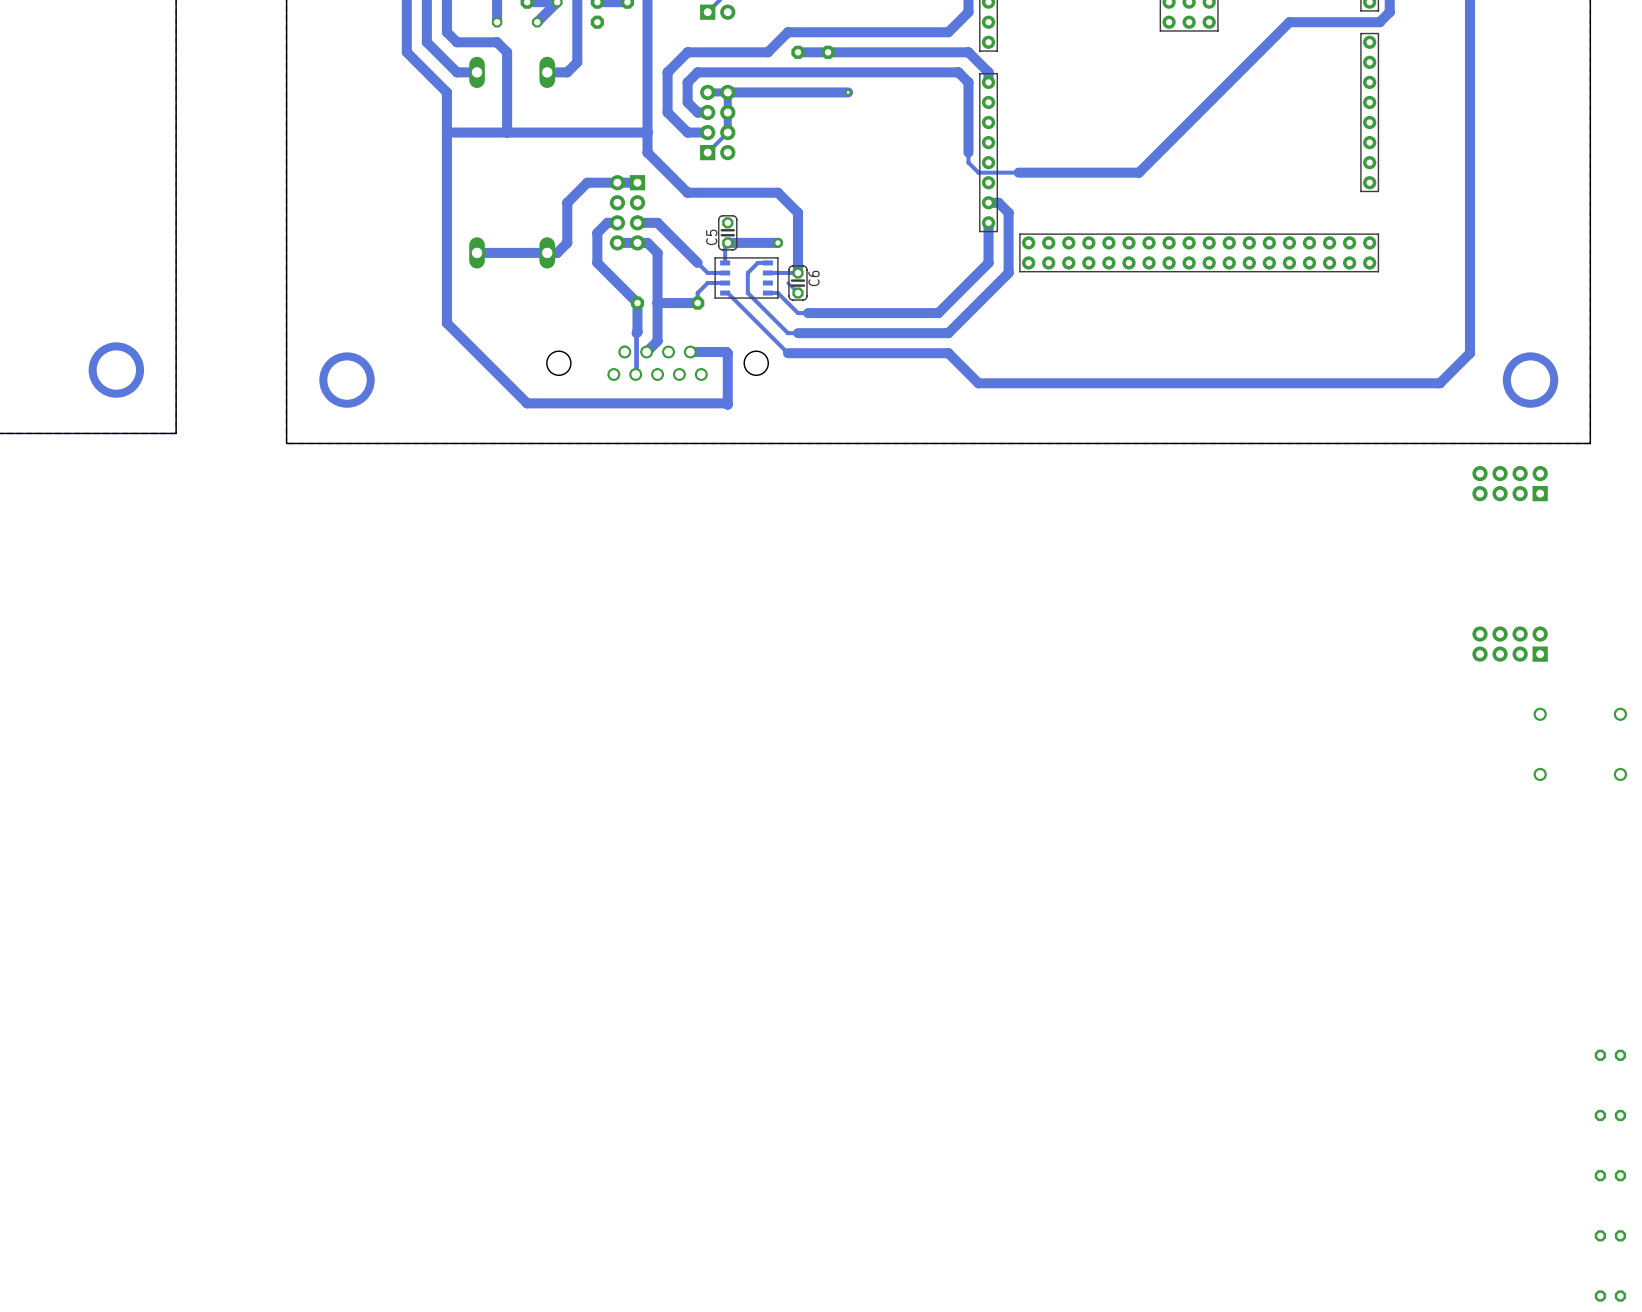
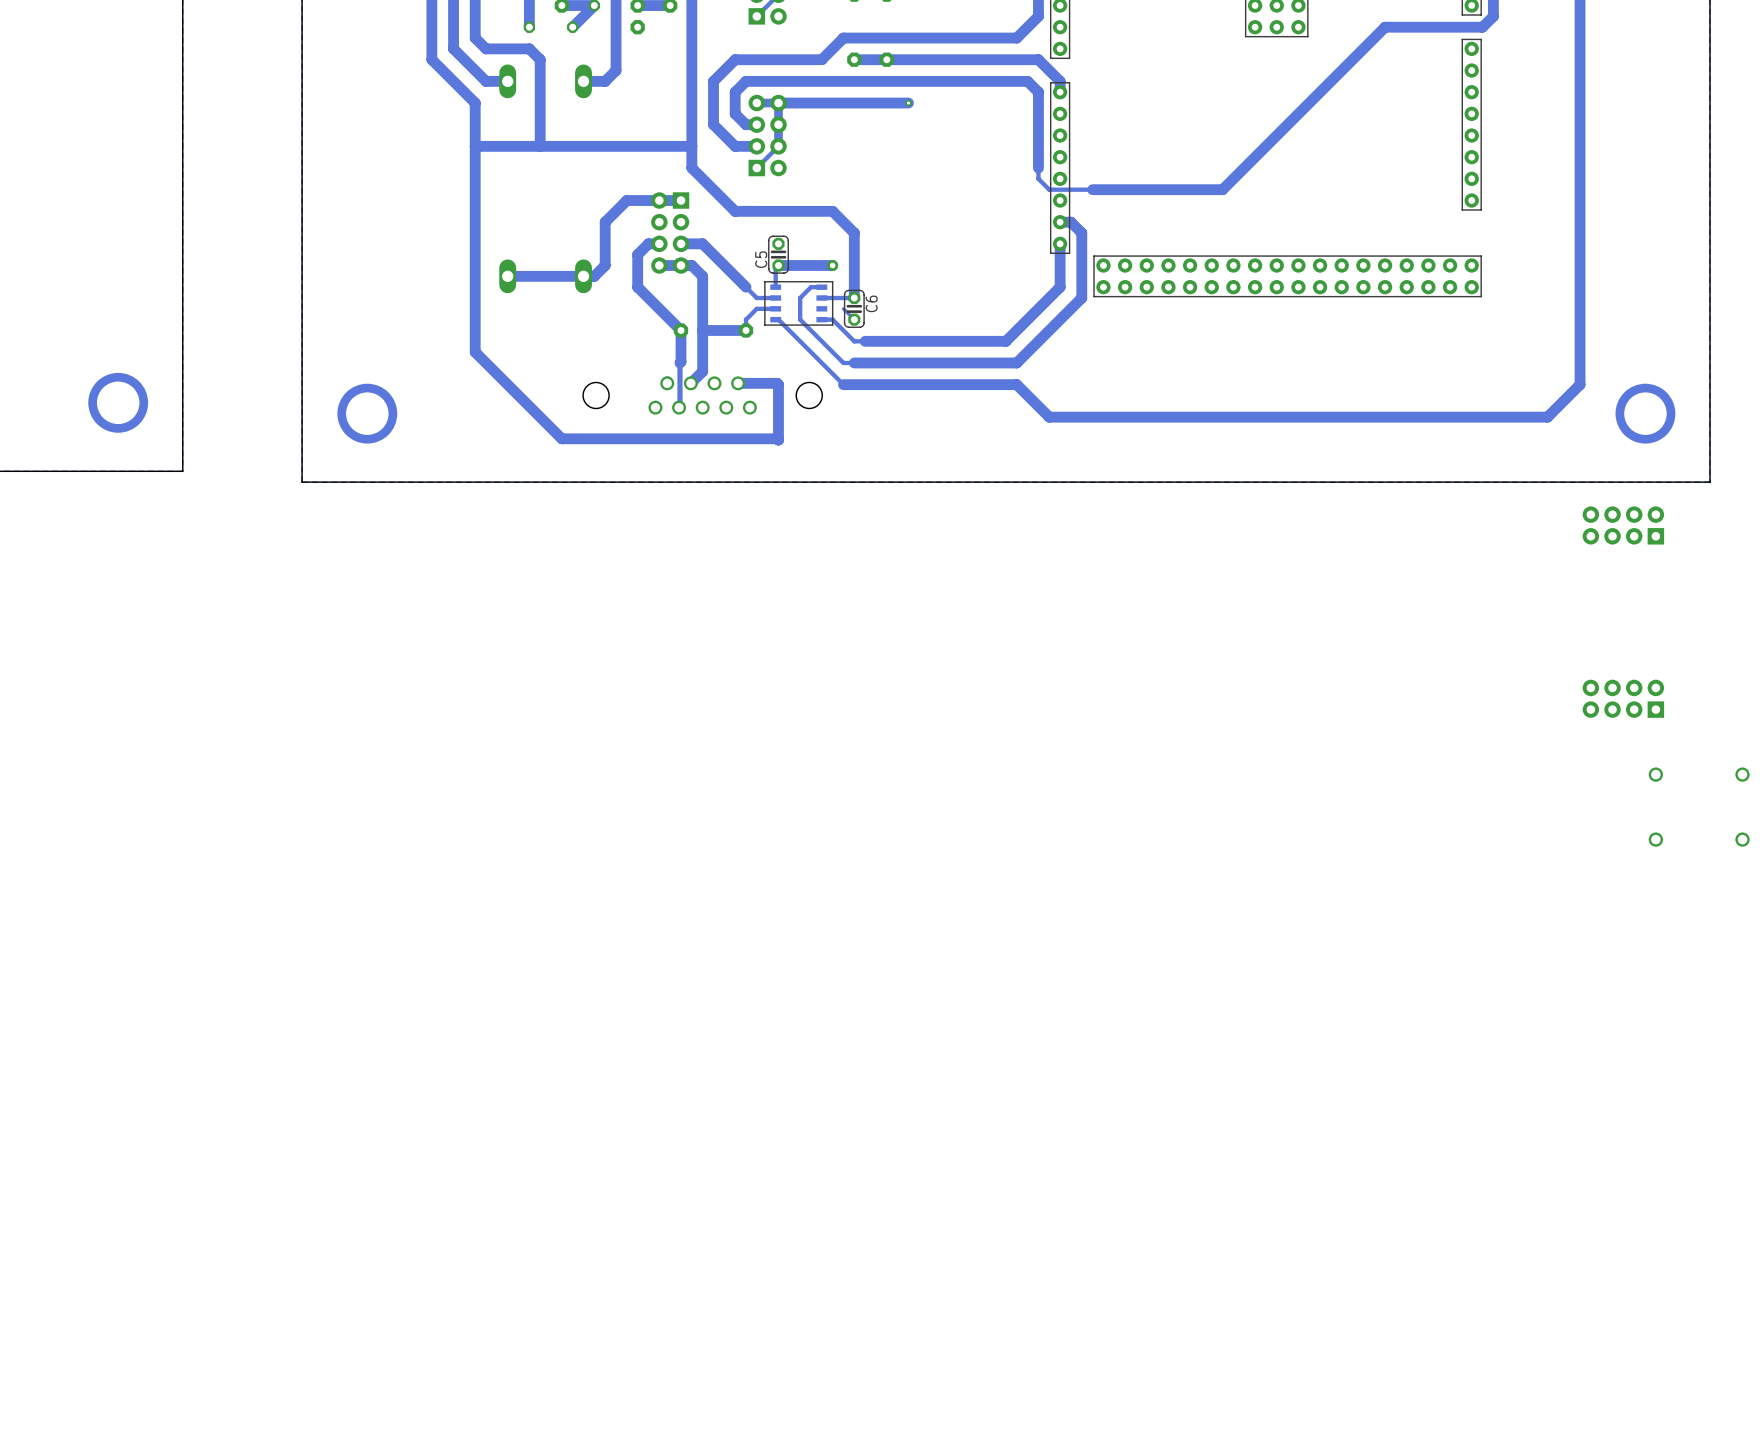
part: (1610, 1055) -> none
part: (1610, 1115) -> none
part: (1610, 1175) -> none
part: (1610, 1235) -> none
part: (1610, 1296) -> none

